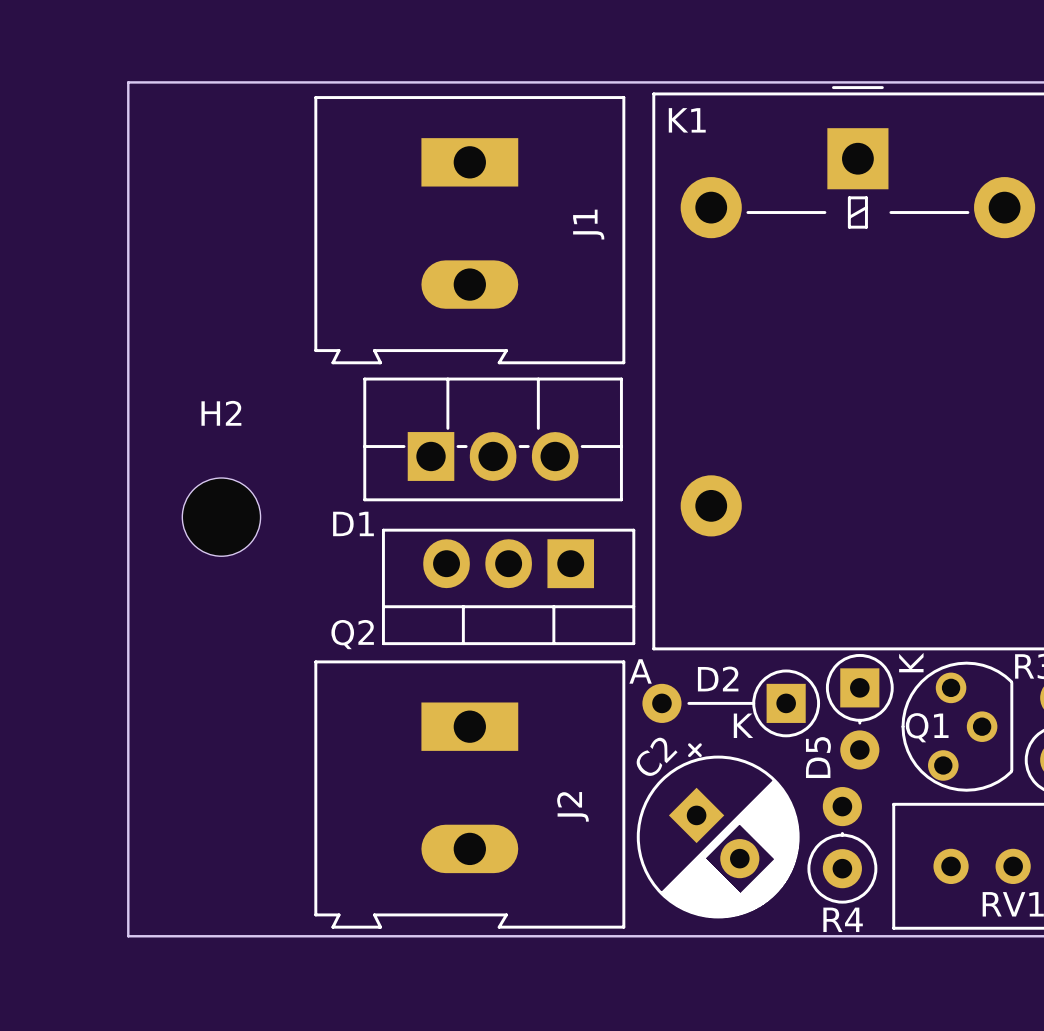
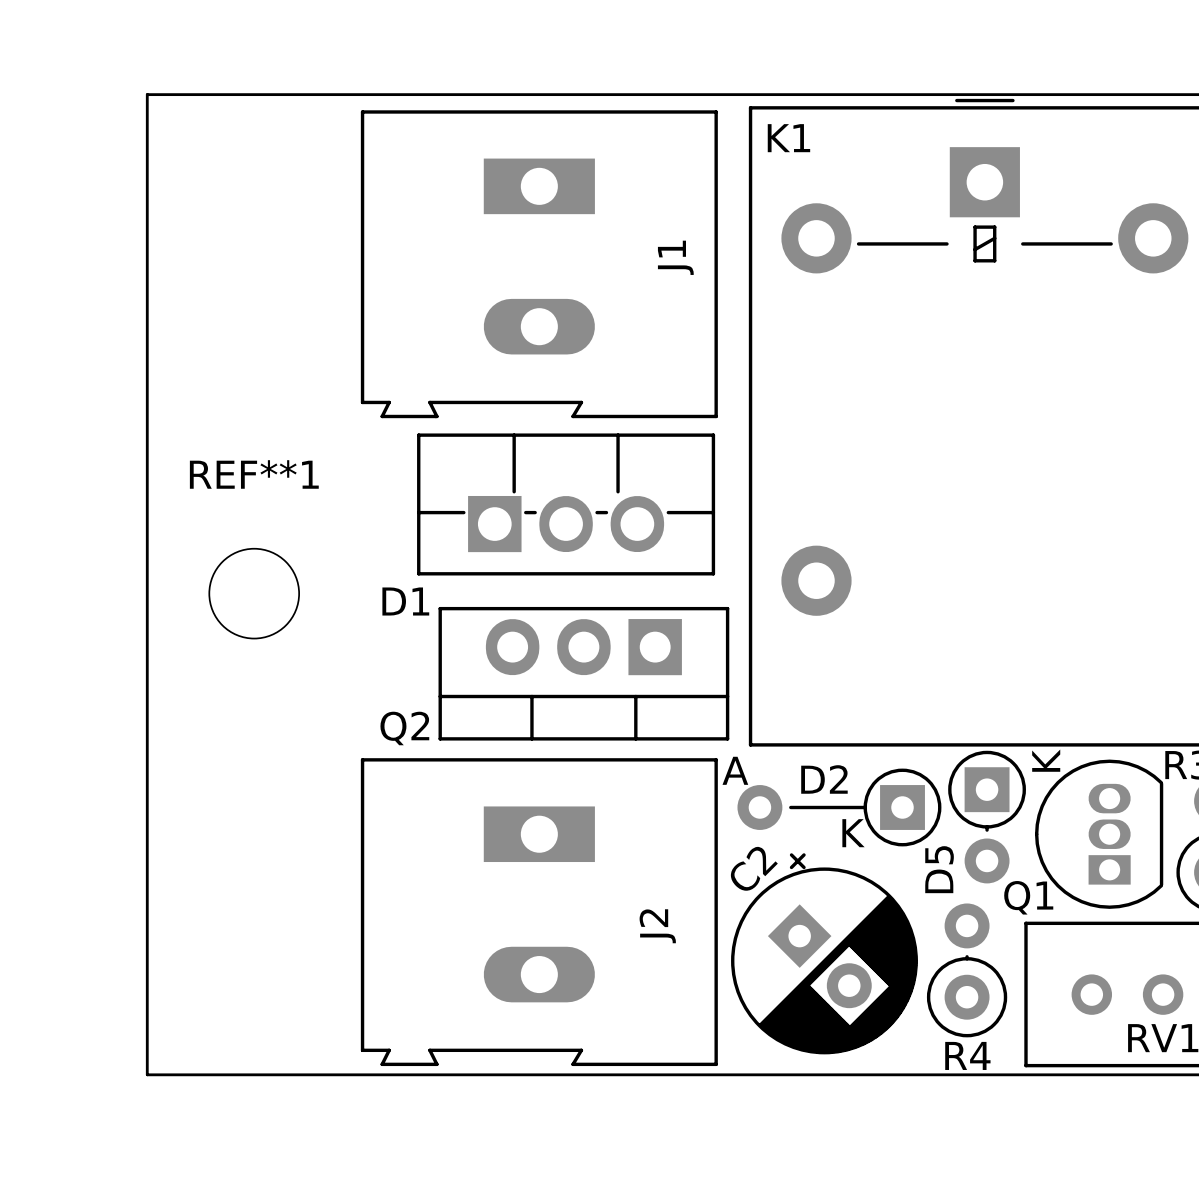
H2 name: H2 (221, 413) -> REF**1 (254, 474)
Q1 footprint: [901, 661, 1014, 792] -> [1034, 759, 1164, 909]
Q1 name position: Q1 (927, 727) -> Q1 (1028, 897)

